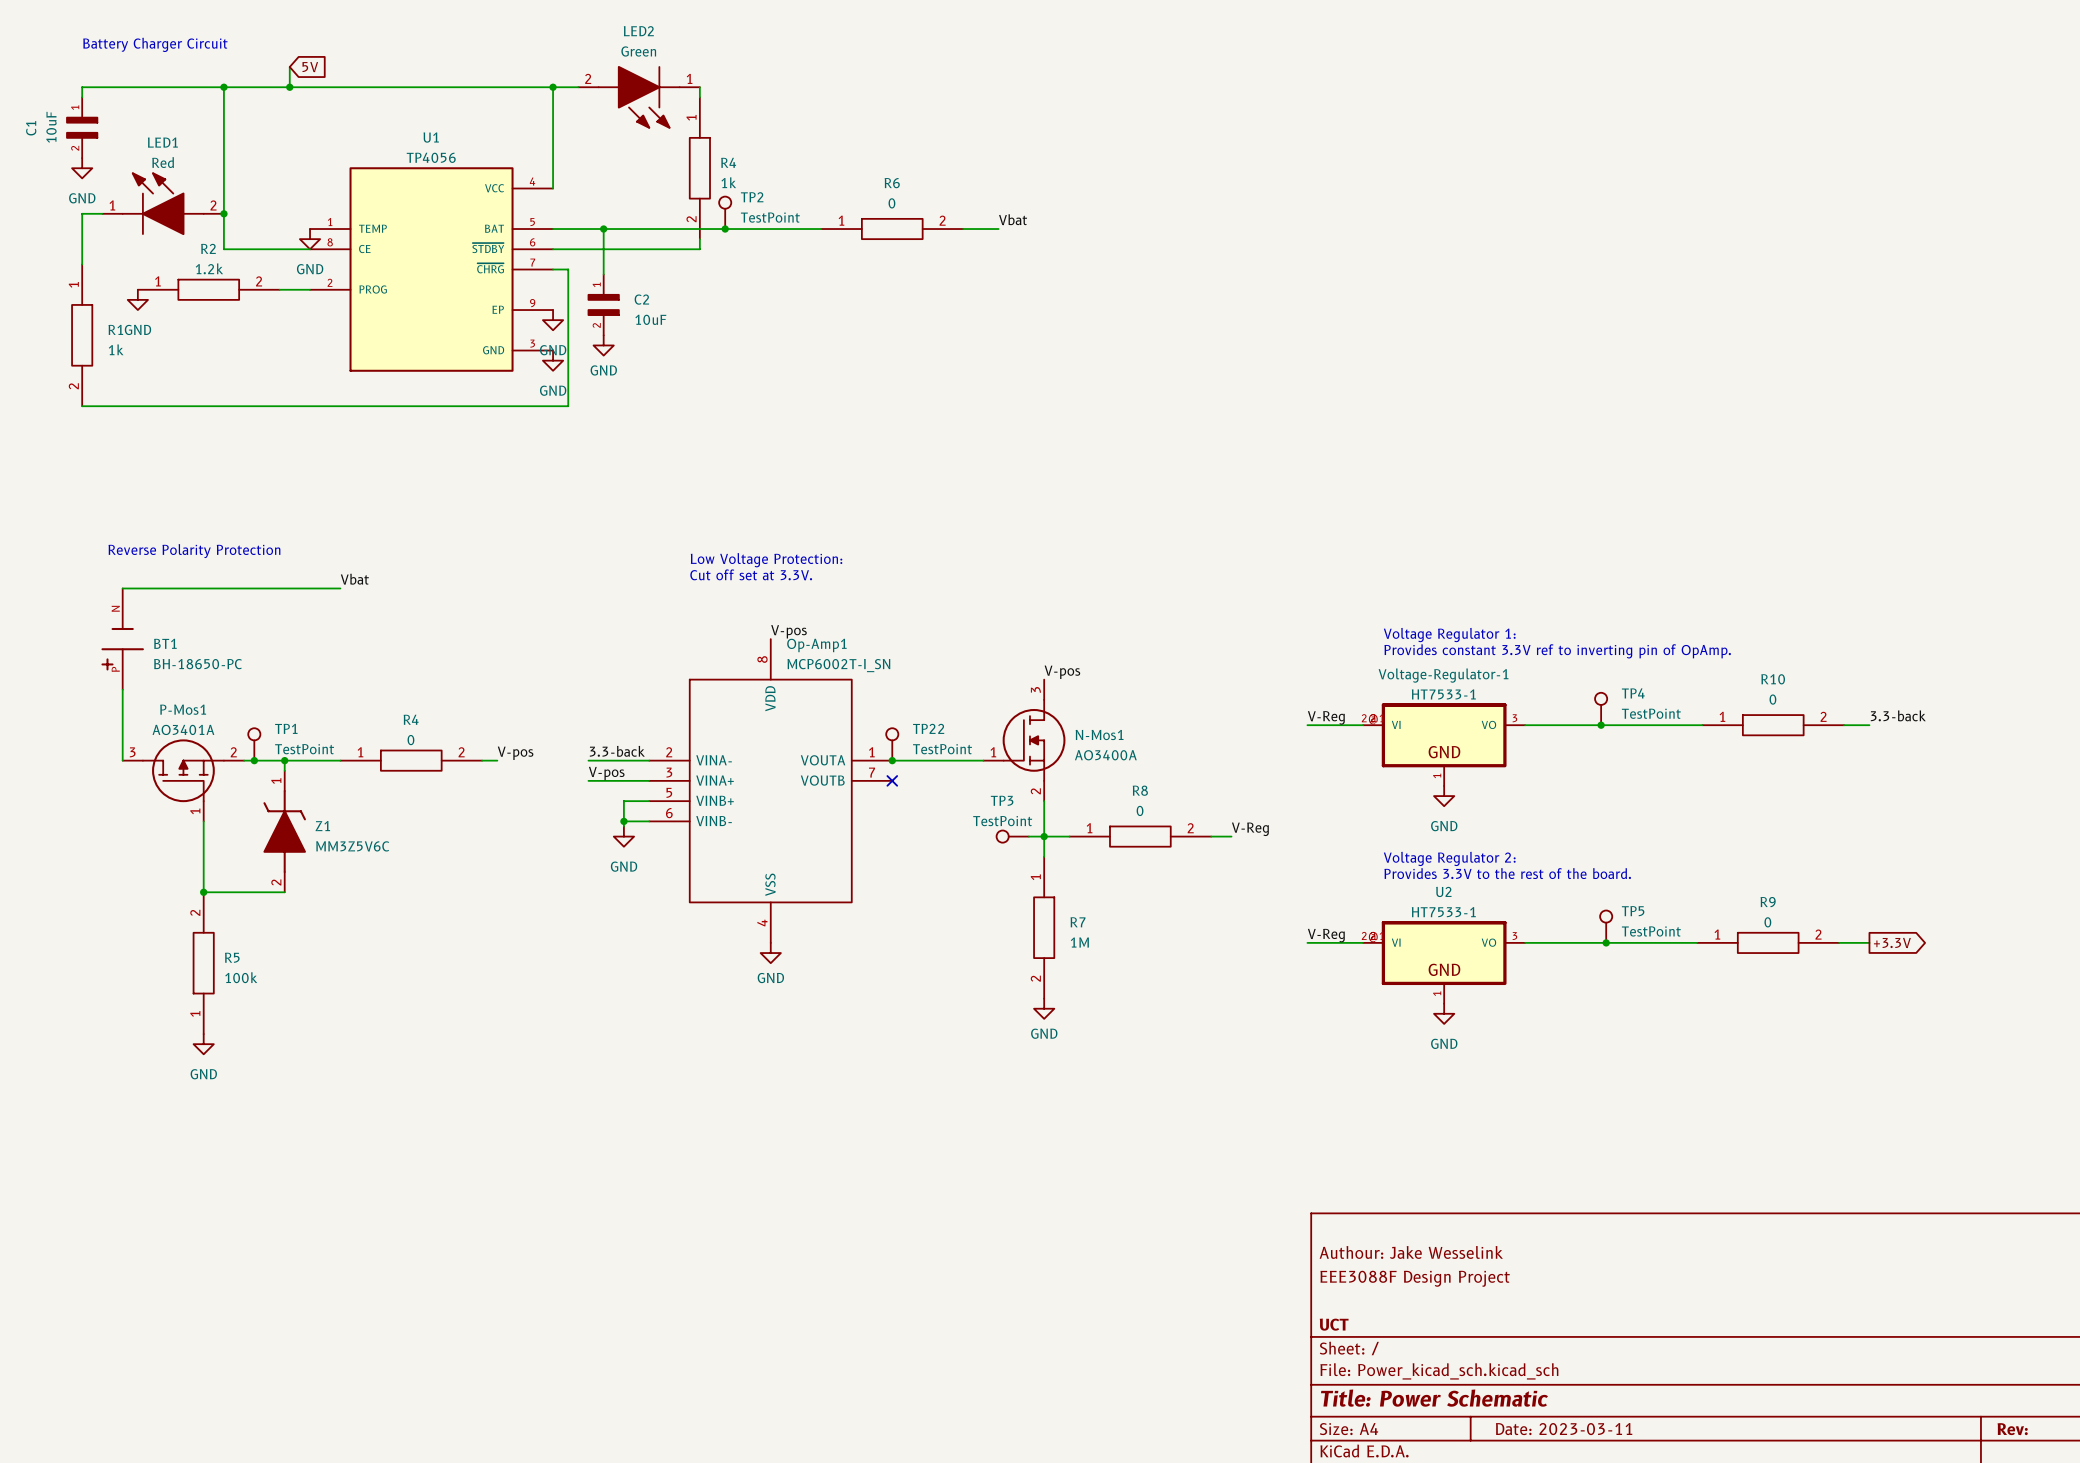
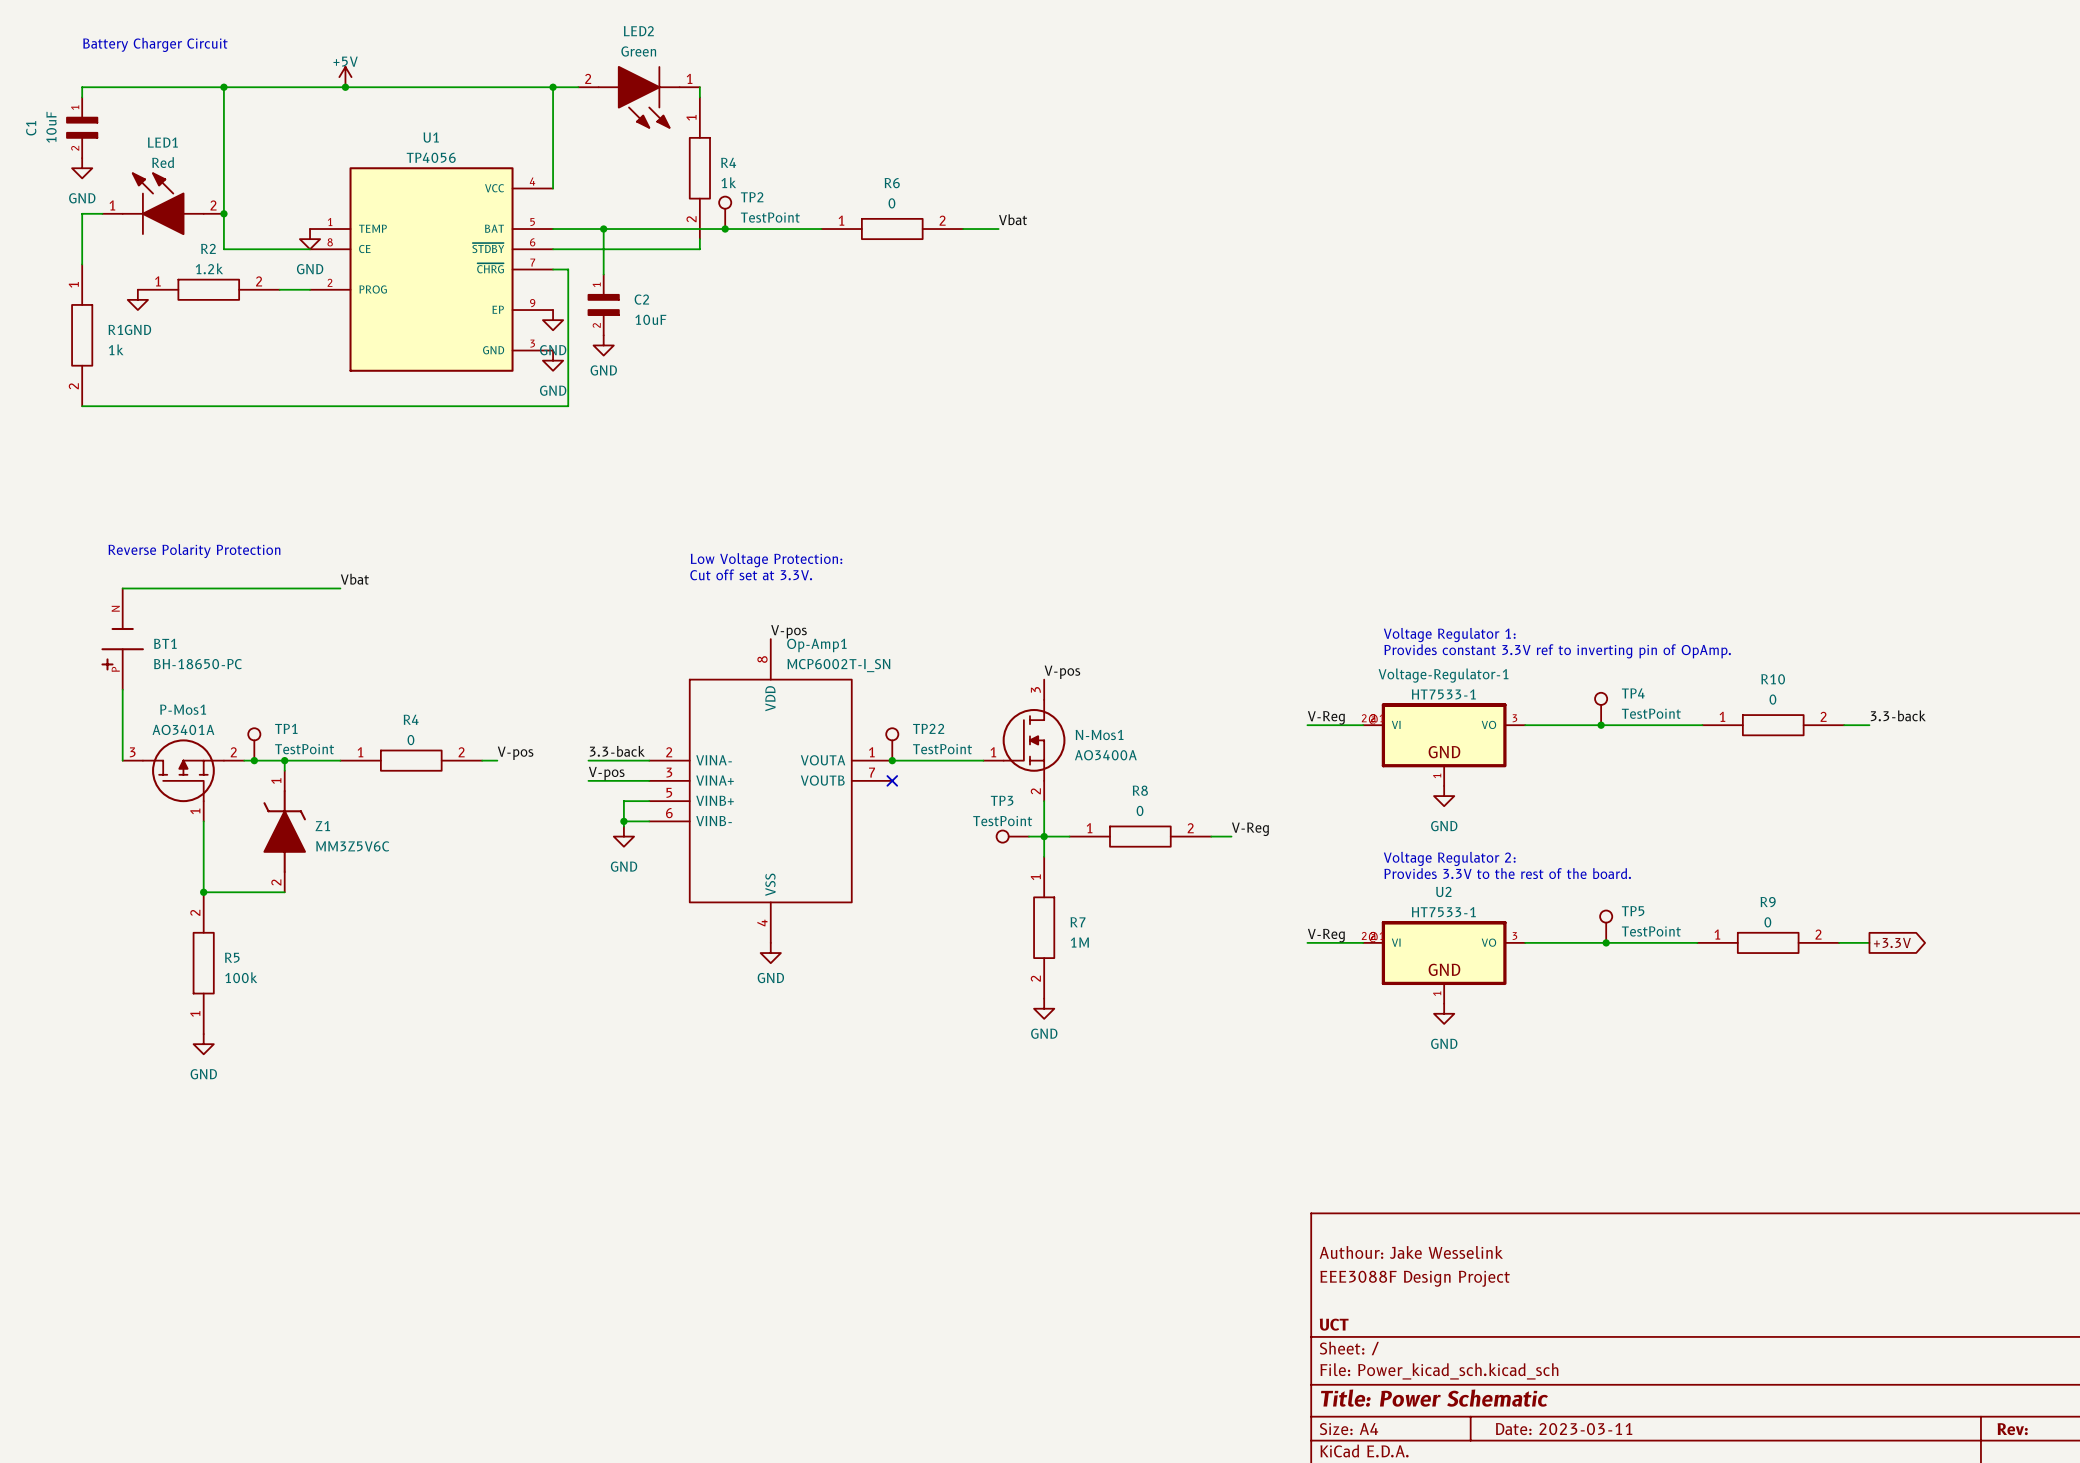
wire: (289, 66) (289, 87) -> none
global label: 5V (310, 67) -> none
power symbol: none -> +5V (345, 77)
junction: (289, 87) -> none
junction: none -> (345, 87)

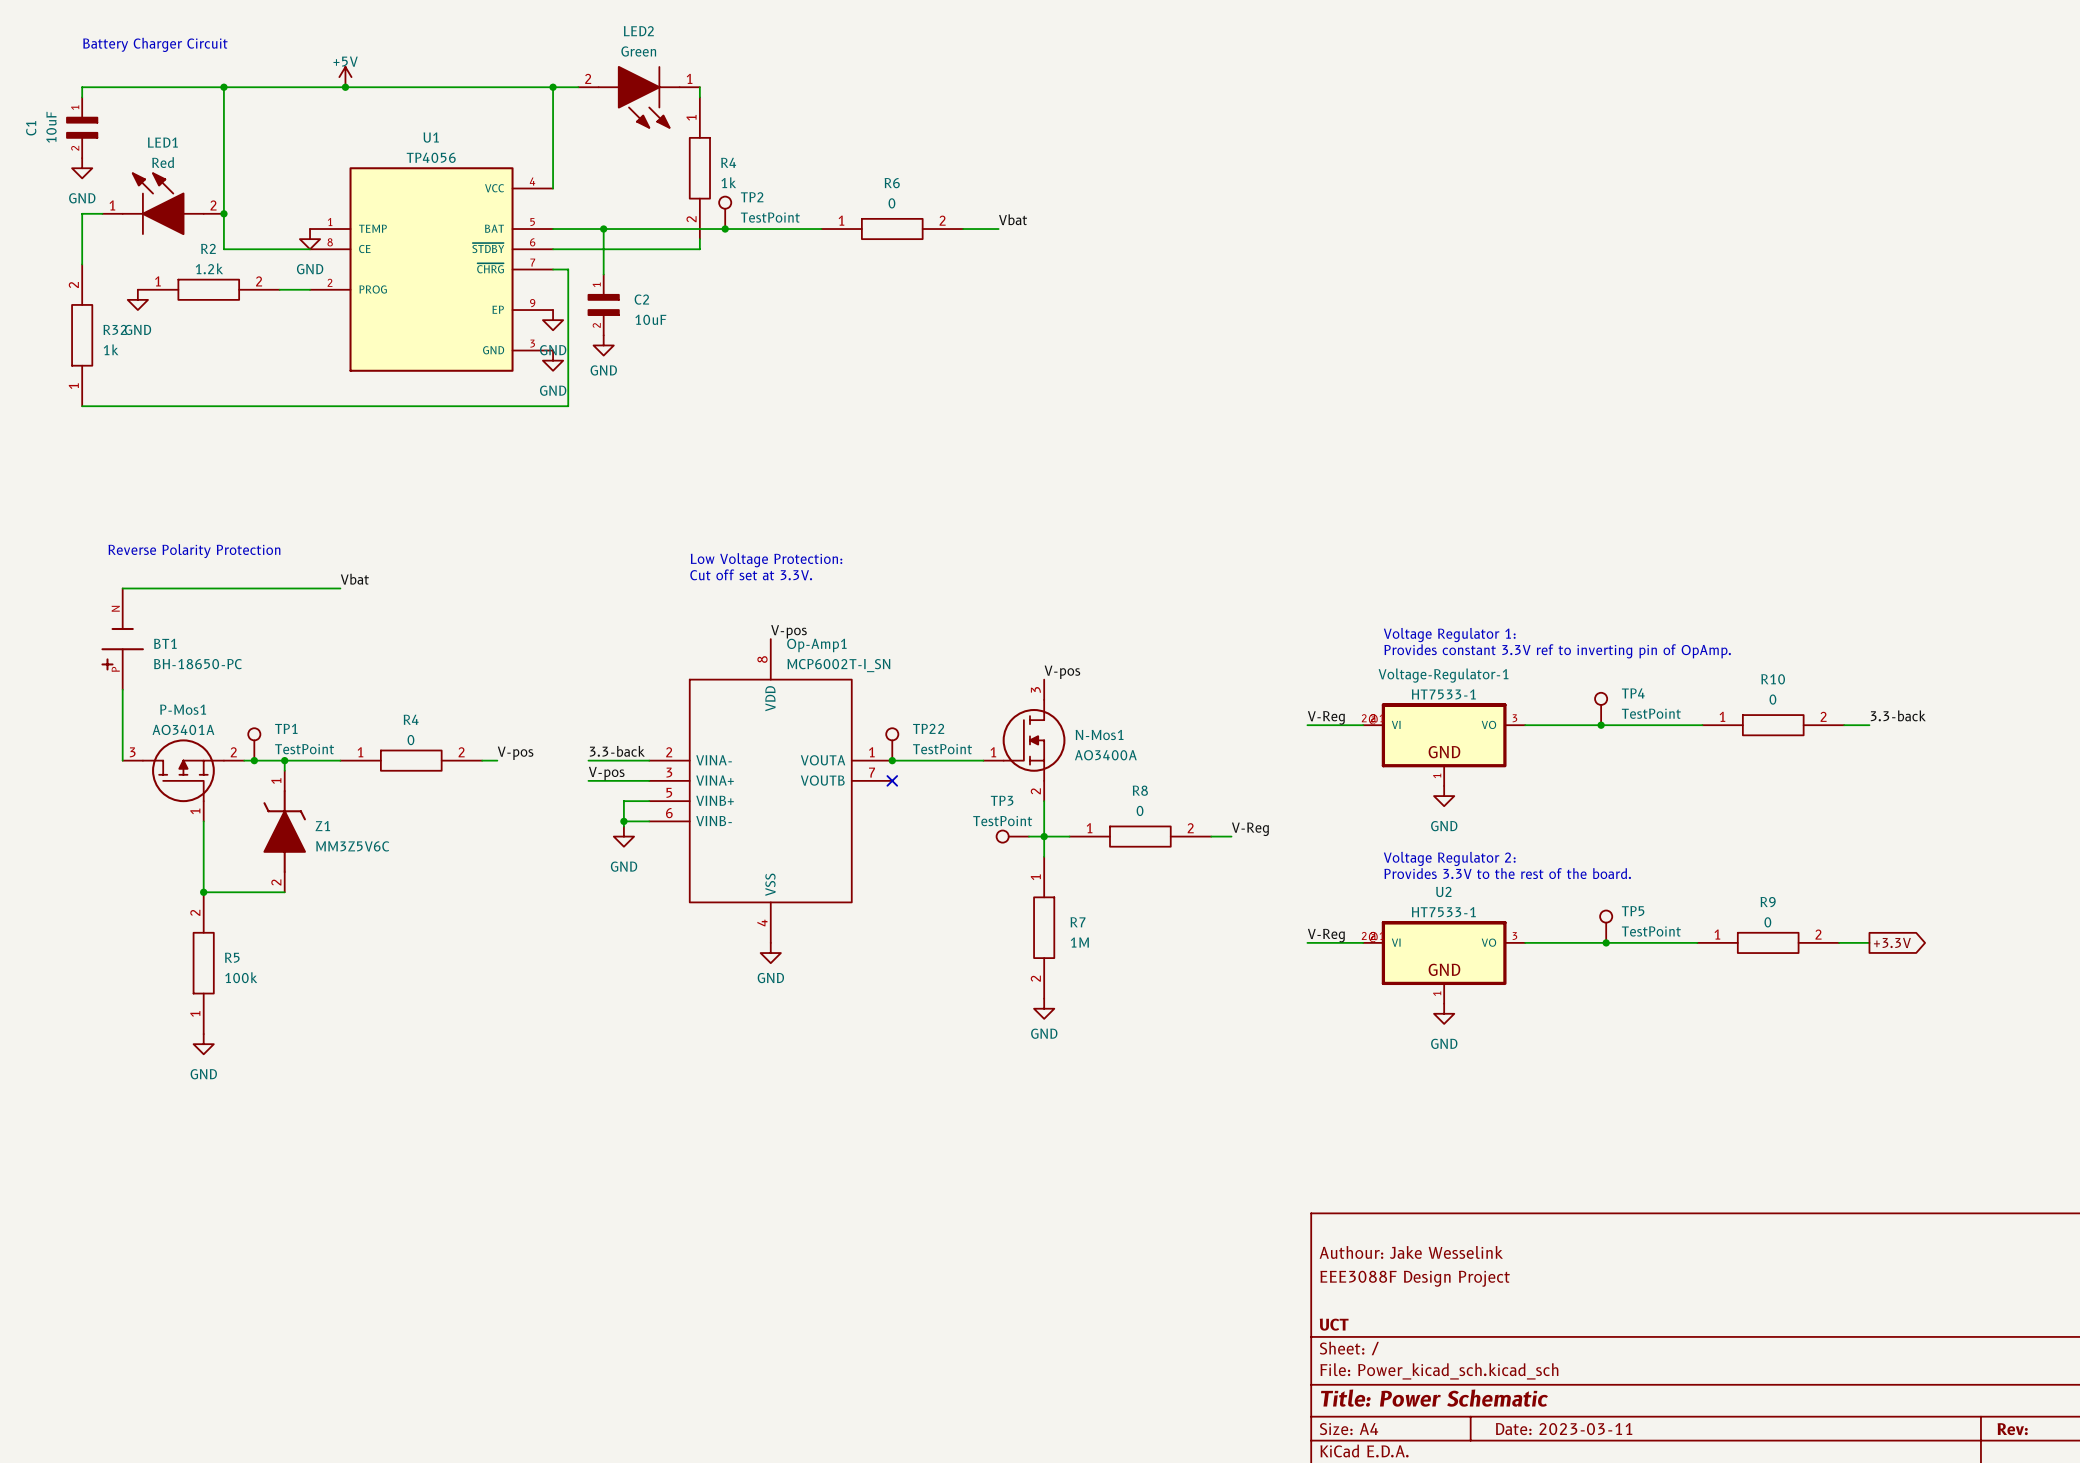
R1 name: R1 (115, 329) -> R32 (115, 329)
R1 rotation: 0° (82, 335) -> 180° (82, 335)

